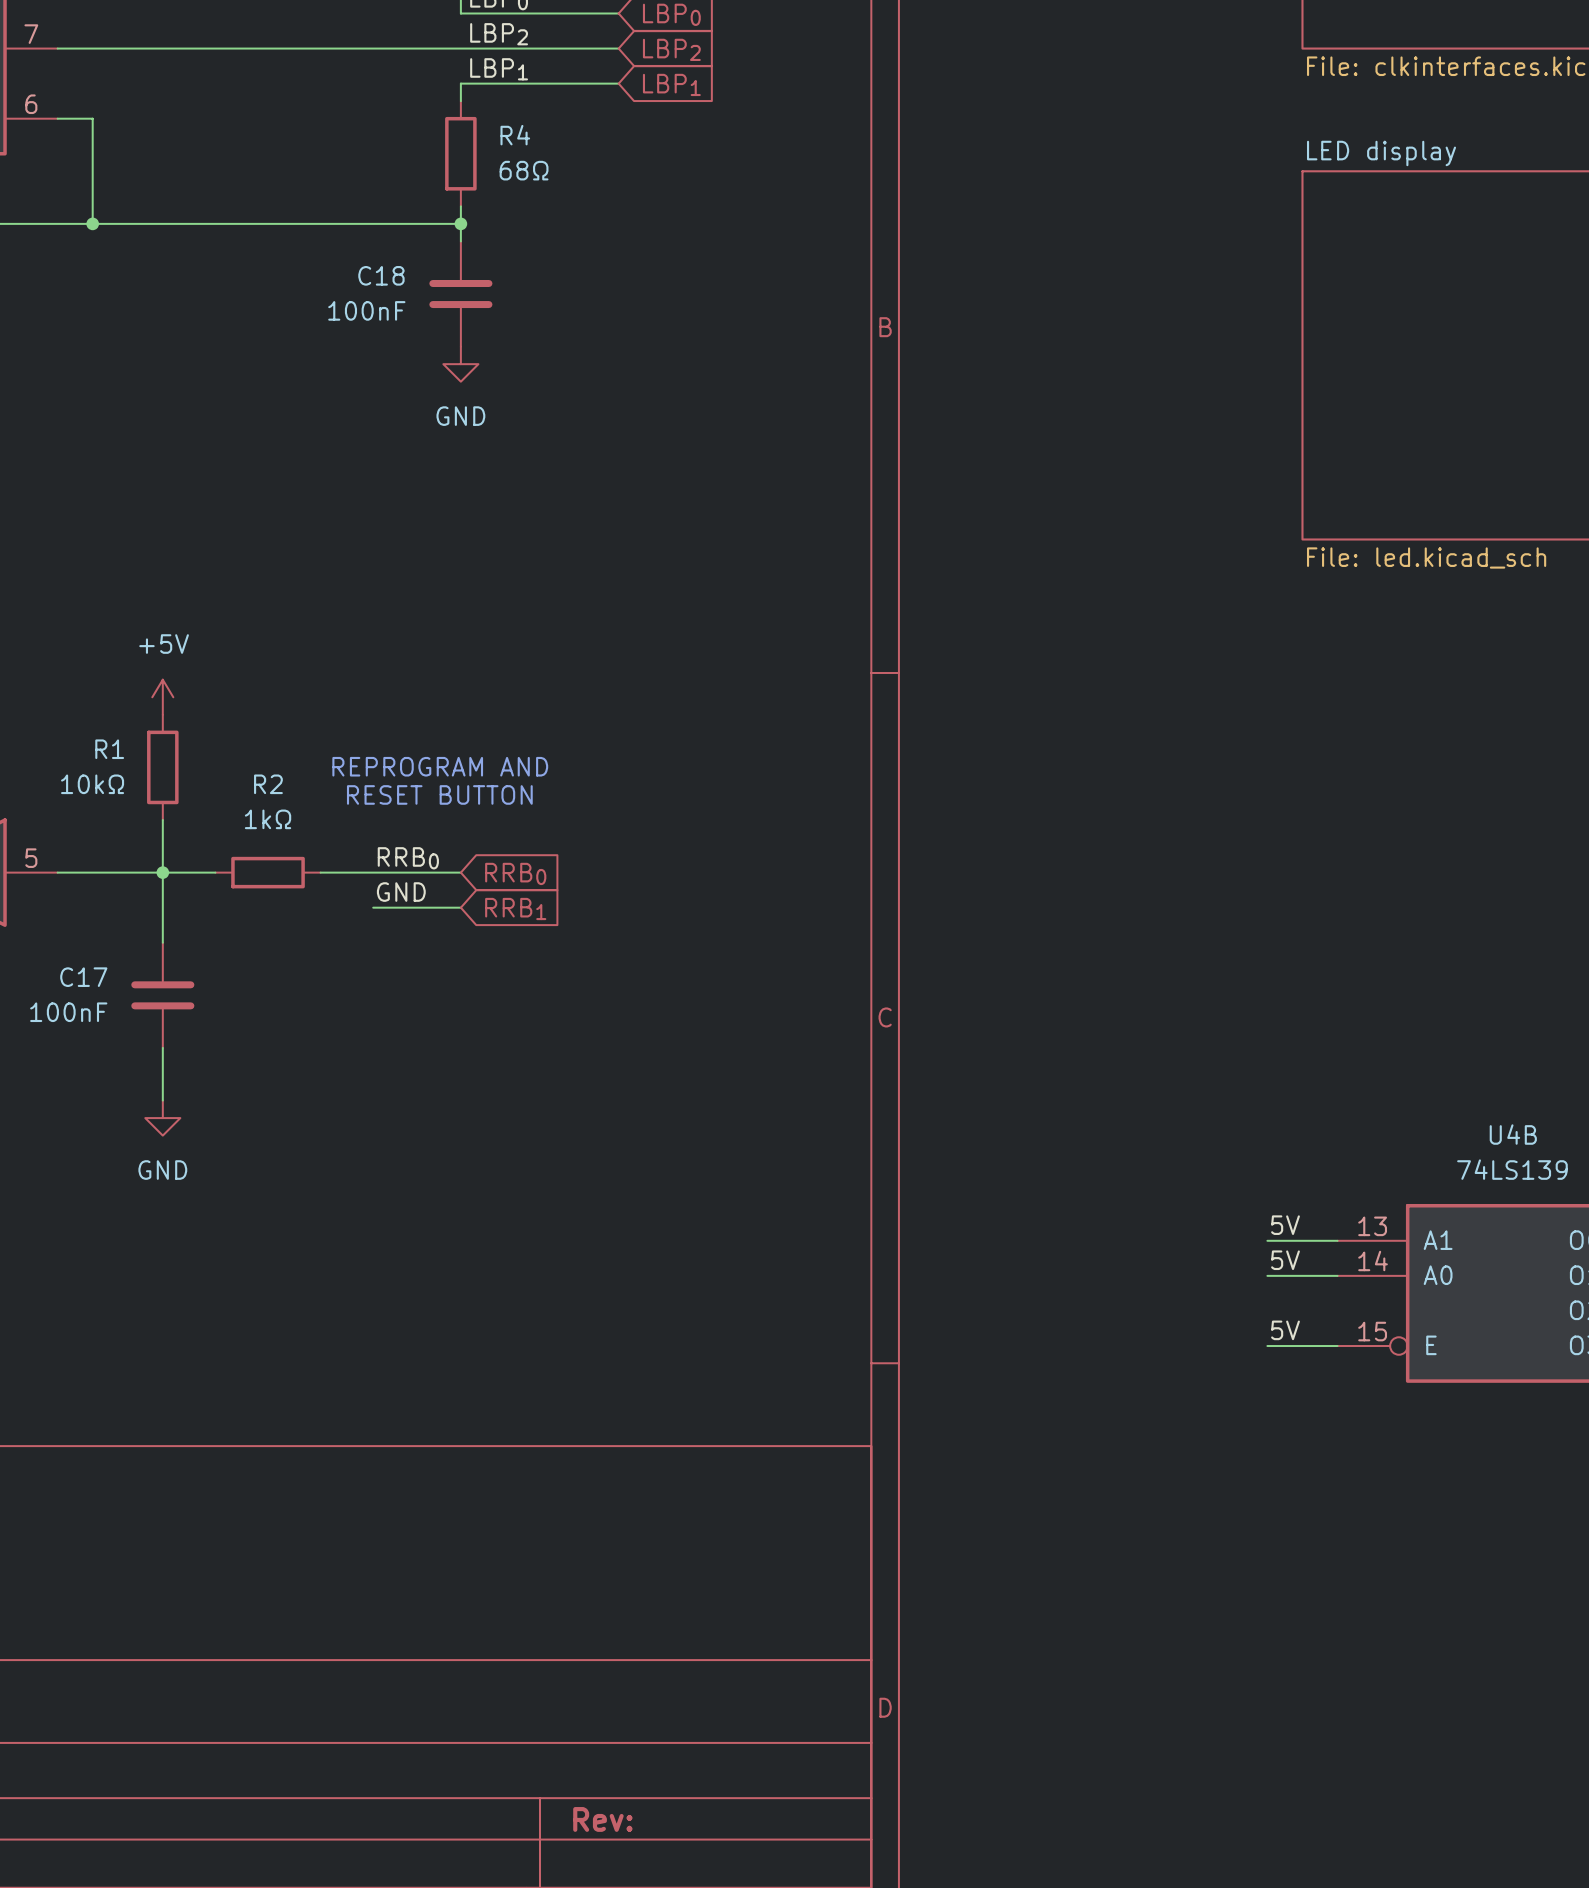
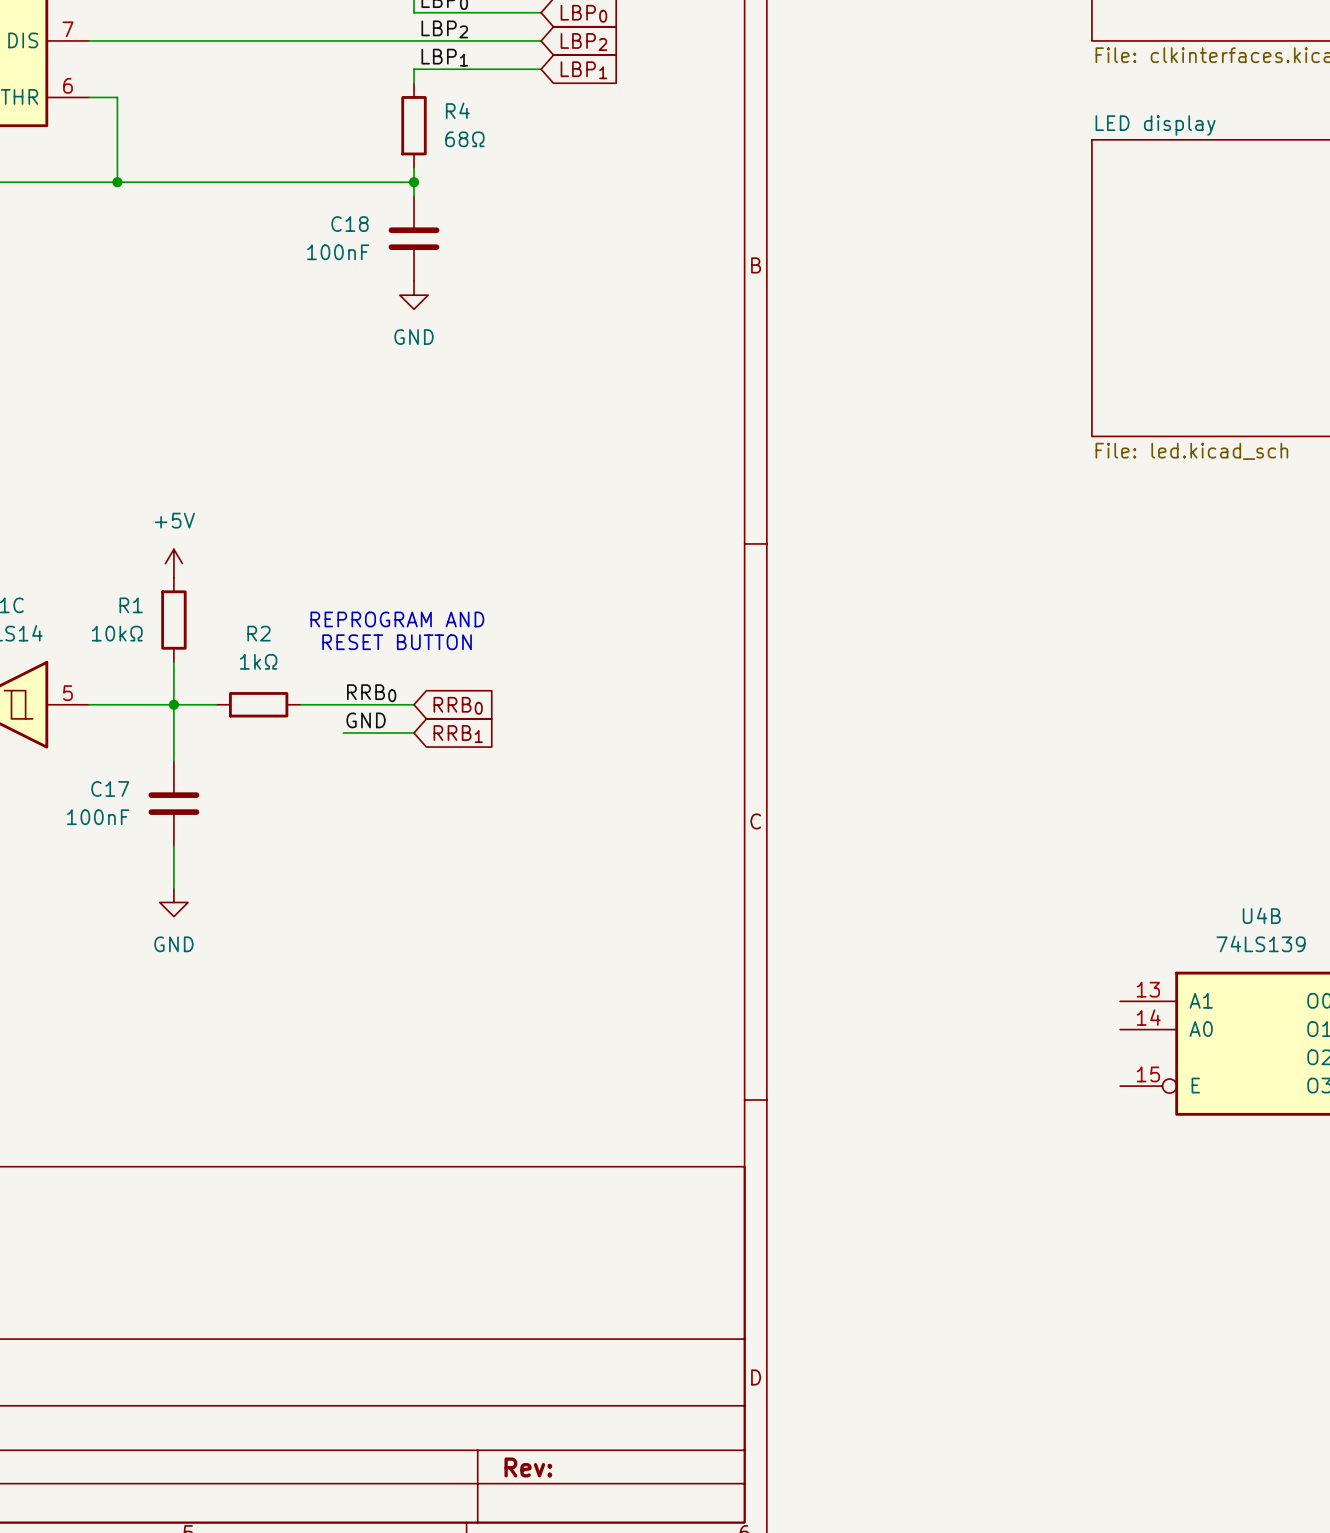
label: 5V (1285, 1225) -> none
wire: (1267, 1240) (1337, 1240) -> none
label: 5V (1285, 1260) -> none
wire: (1267, 1275) (1337, 1275) -> none
label: 5V (1285, 1330) -> none
wire: (1267, 1346) (1337, 1346) -> none

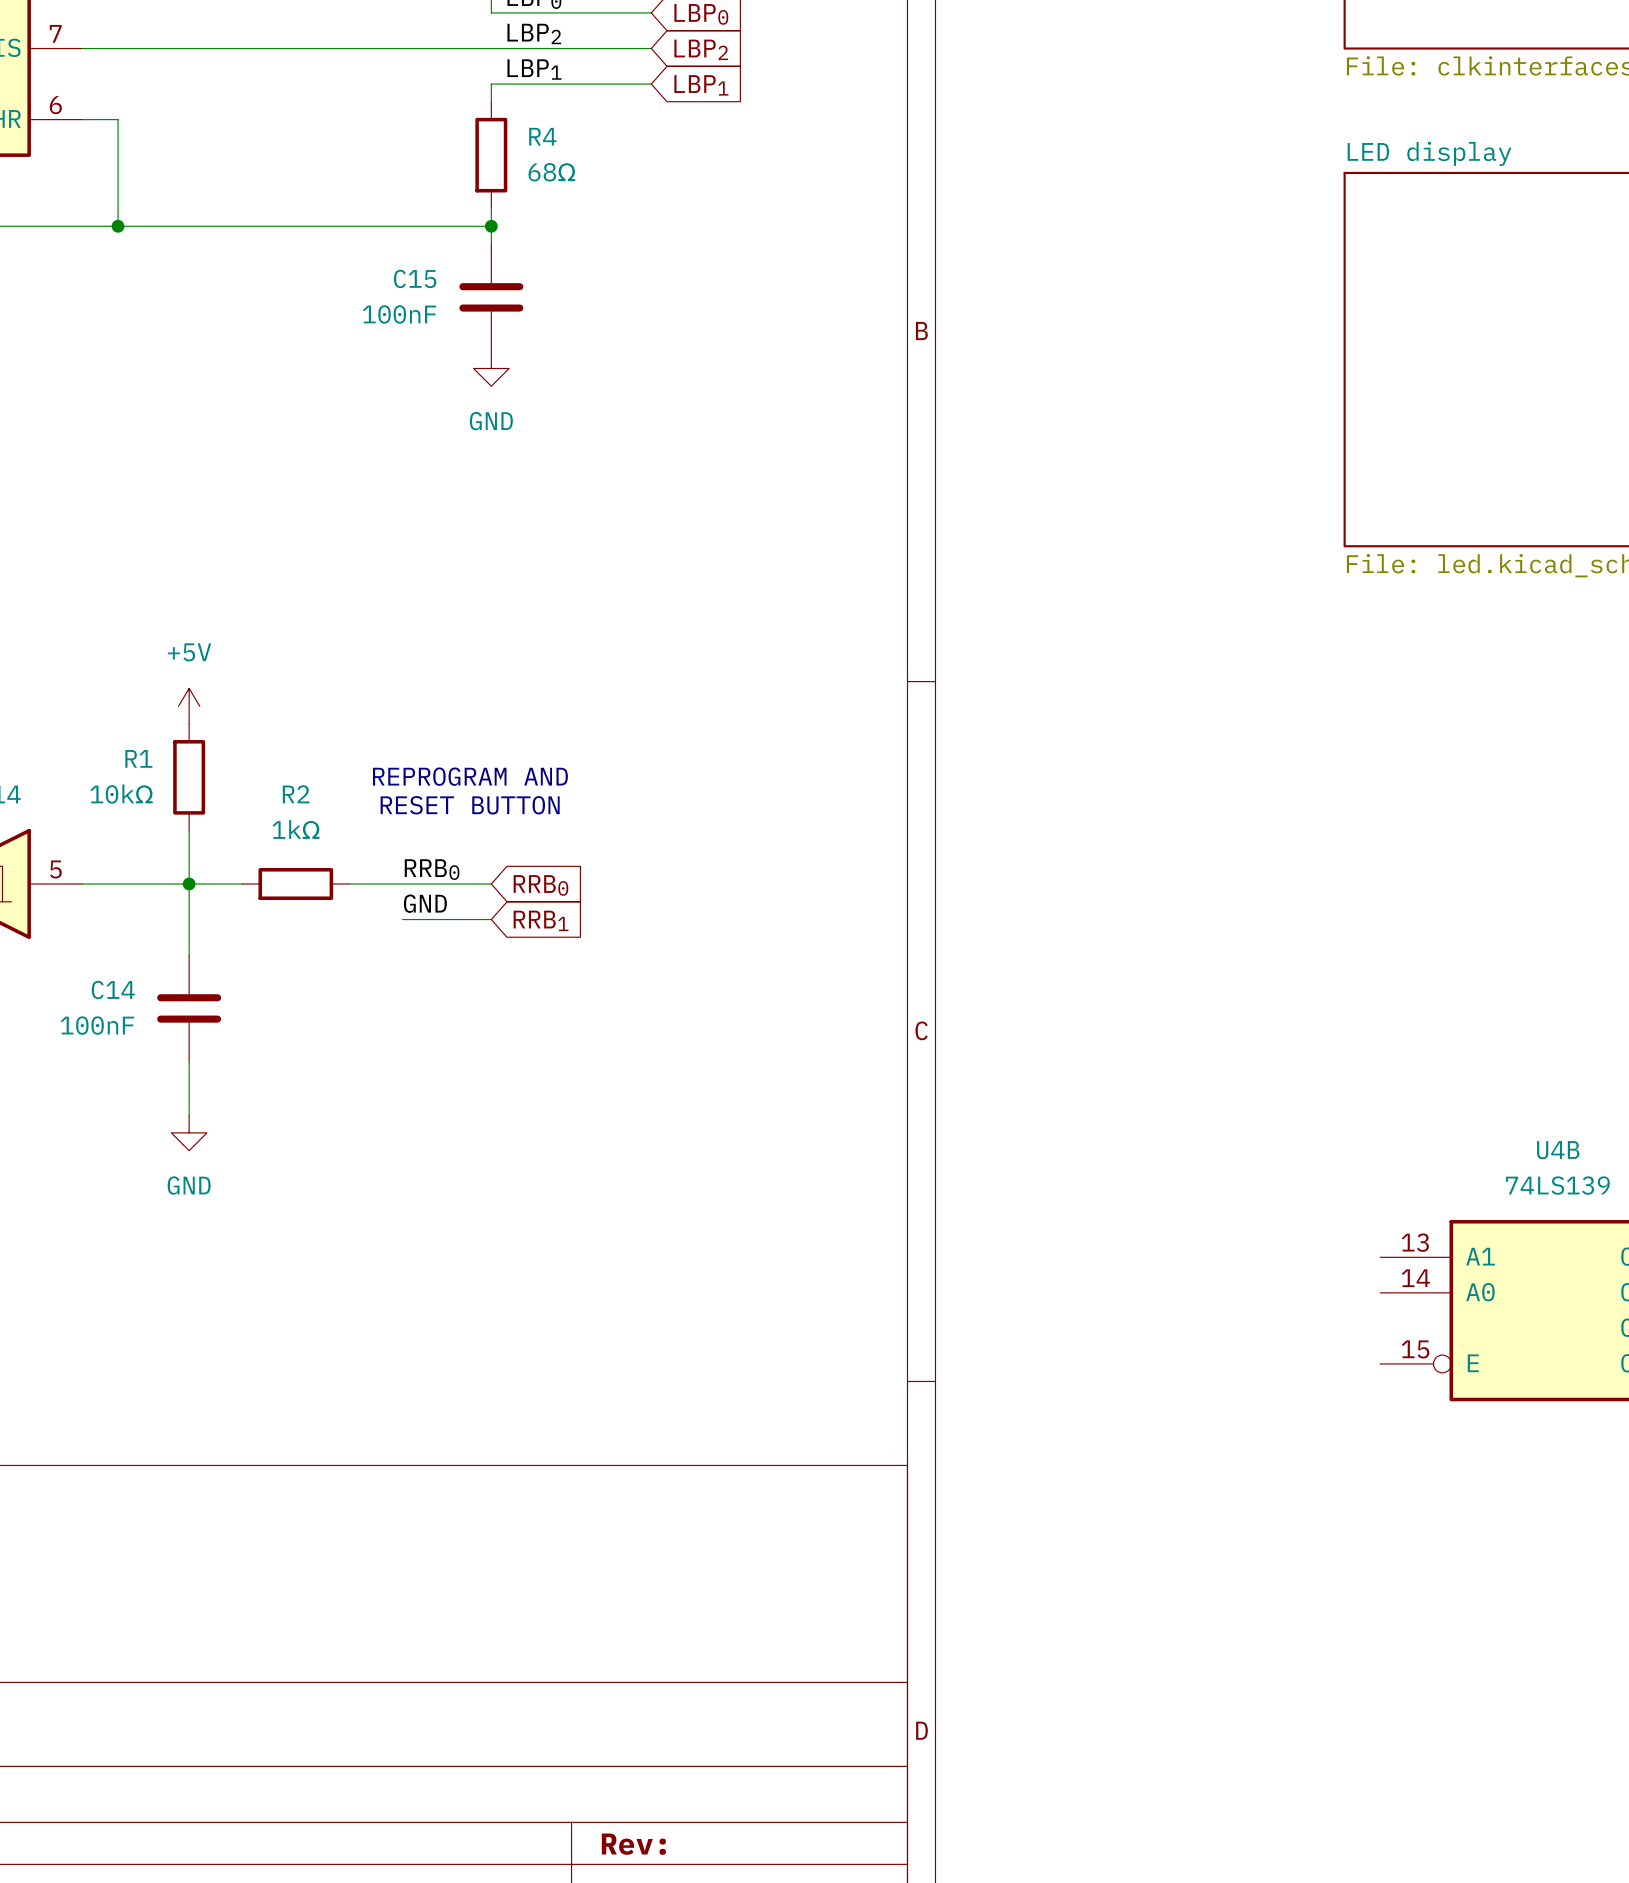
C18 name: C18 (350, 224) -> C15 (415, 278)
C17 name: C17 (110, 788) -> C14 (113, 990)

